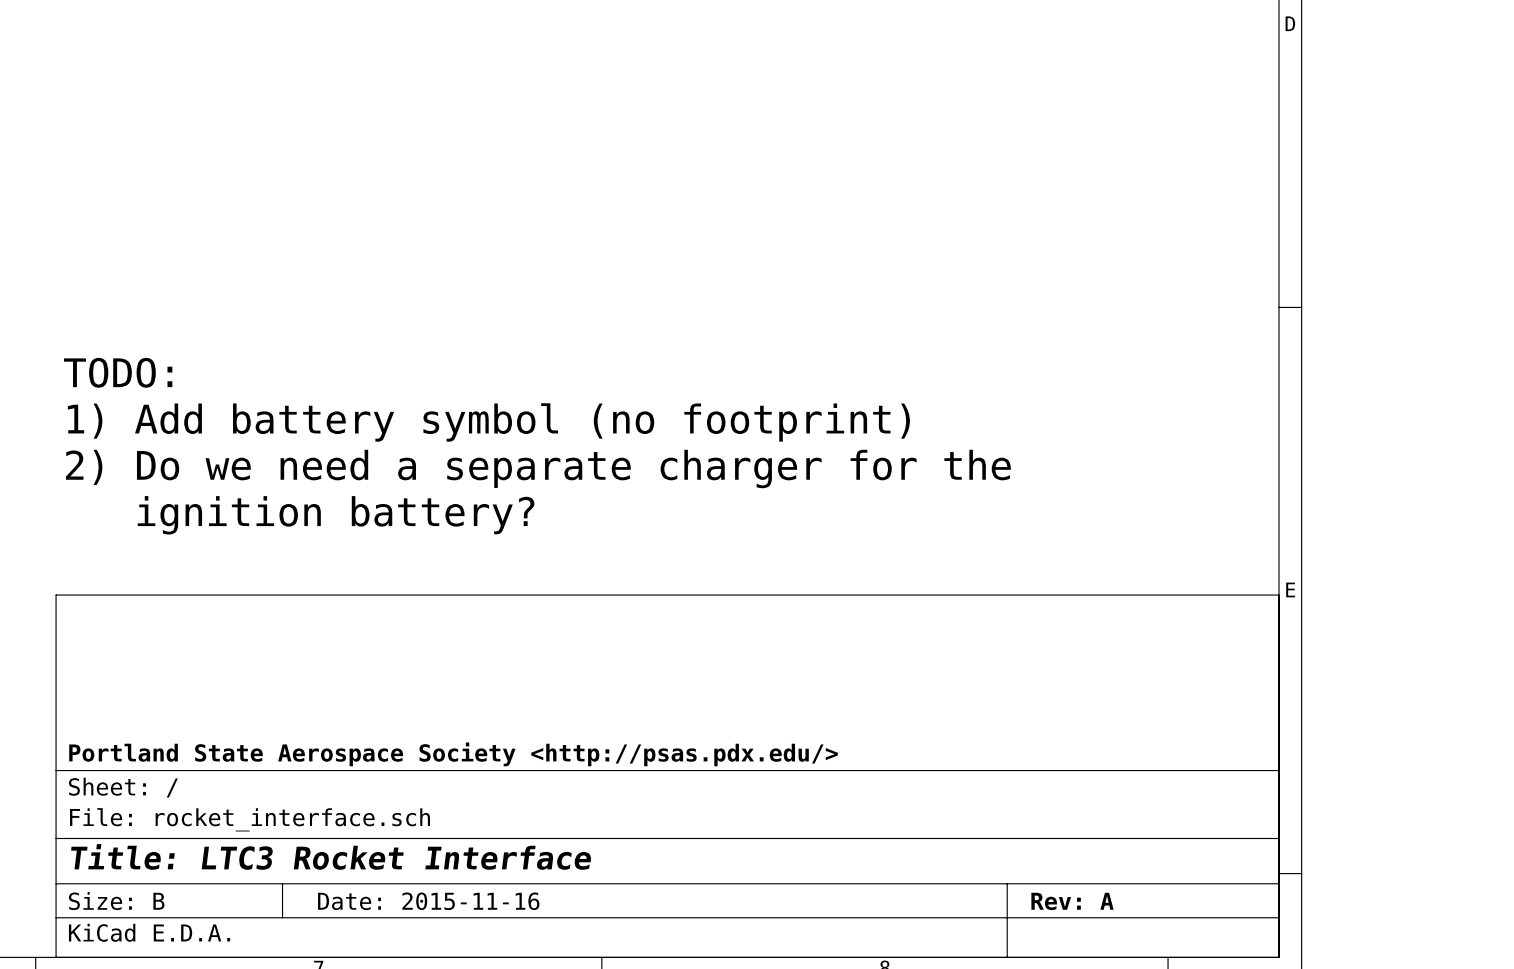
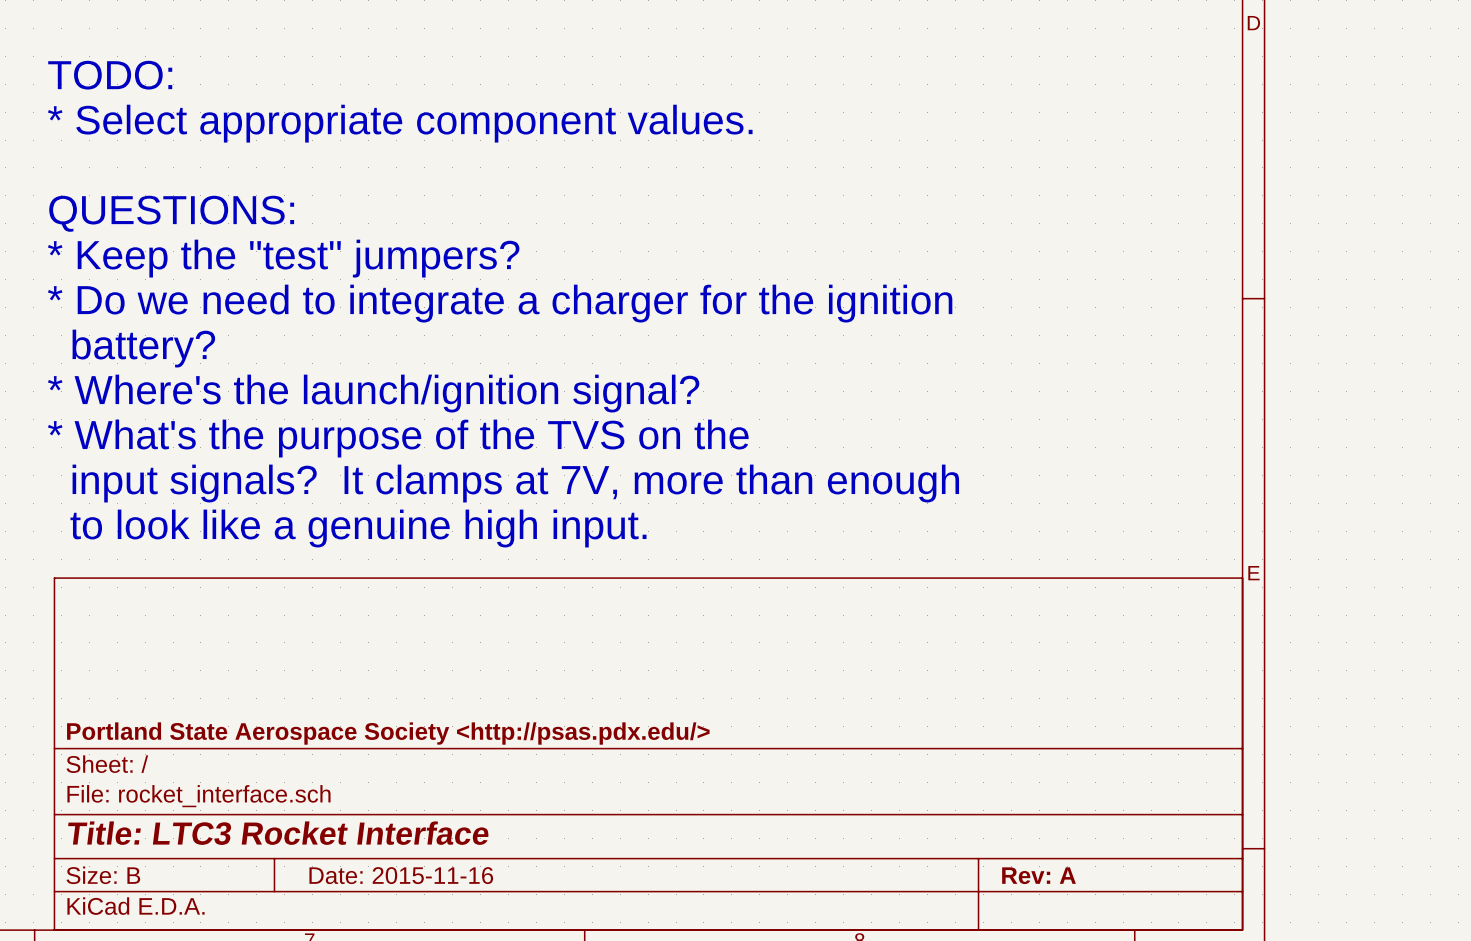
text: none -> TODO: (110, 75)
text: none -> * Select appropriate component values. (400, 123)
text: none -> QUESTIONS: (171, 213)
text: none -> * Keep the "test" jumpers? (283, 258)
text: none -> * Do we need to integrate a charger for the ignition (500, 303)
text: none -> battery? (143, 348)
text: TODO: (118, 372) -> none
text: none -> * Where's the launch/ignition signal? (373, 393)
text: 1) Add battery symbol (no footprint) (488, 422) -> none
text: none -> * What's the purpose of the TVS on the (398, 438)
text: 2) Do we need a separate charger for the (538, 469) -> none
text: none -> input signals? It clamps at 7V, more than enough (515, 483)
text: ignition battery? (336, 515) -> none
text: none -> to look like a genuine high input. (358, 528)

